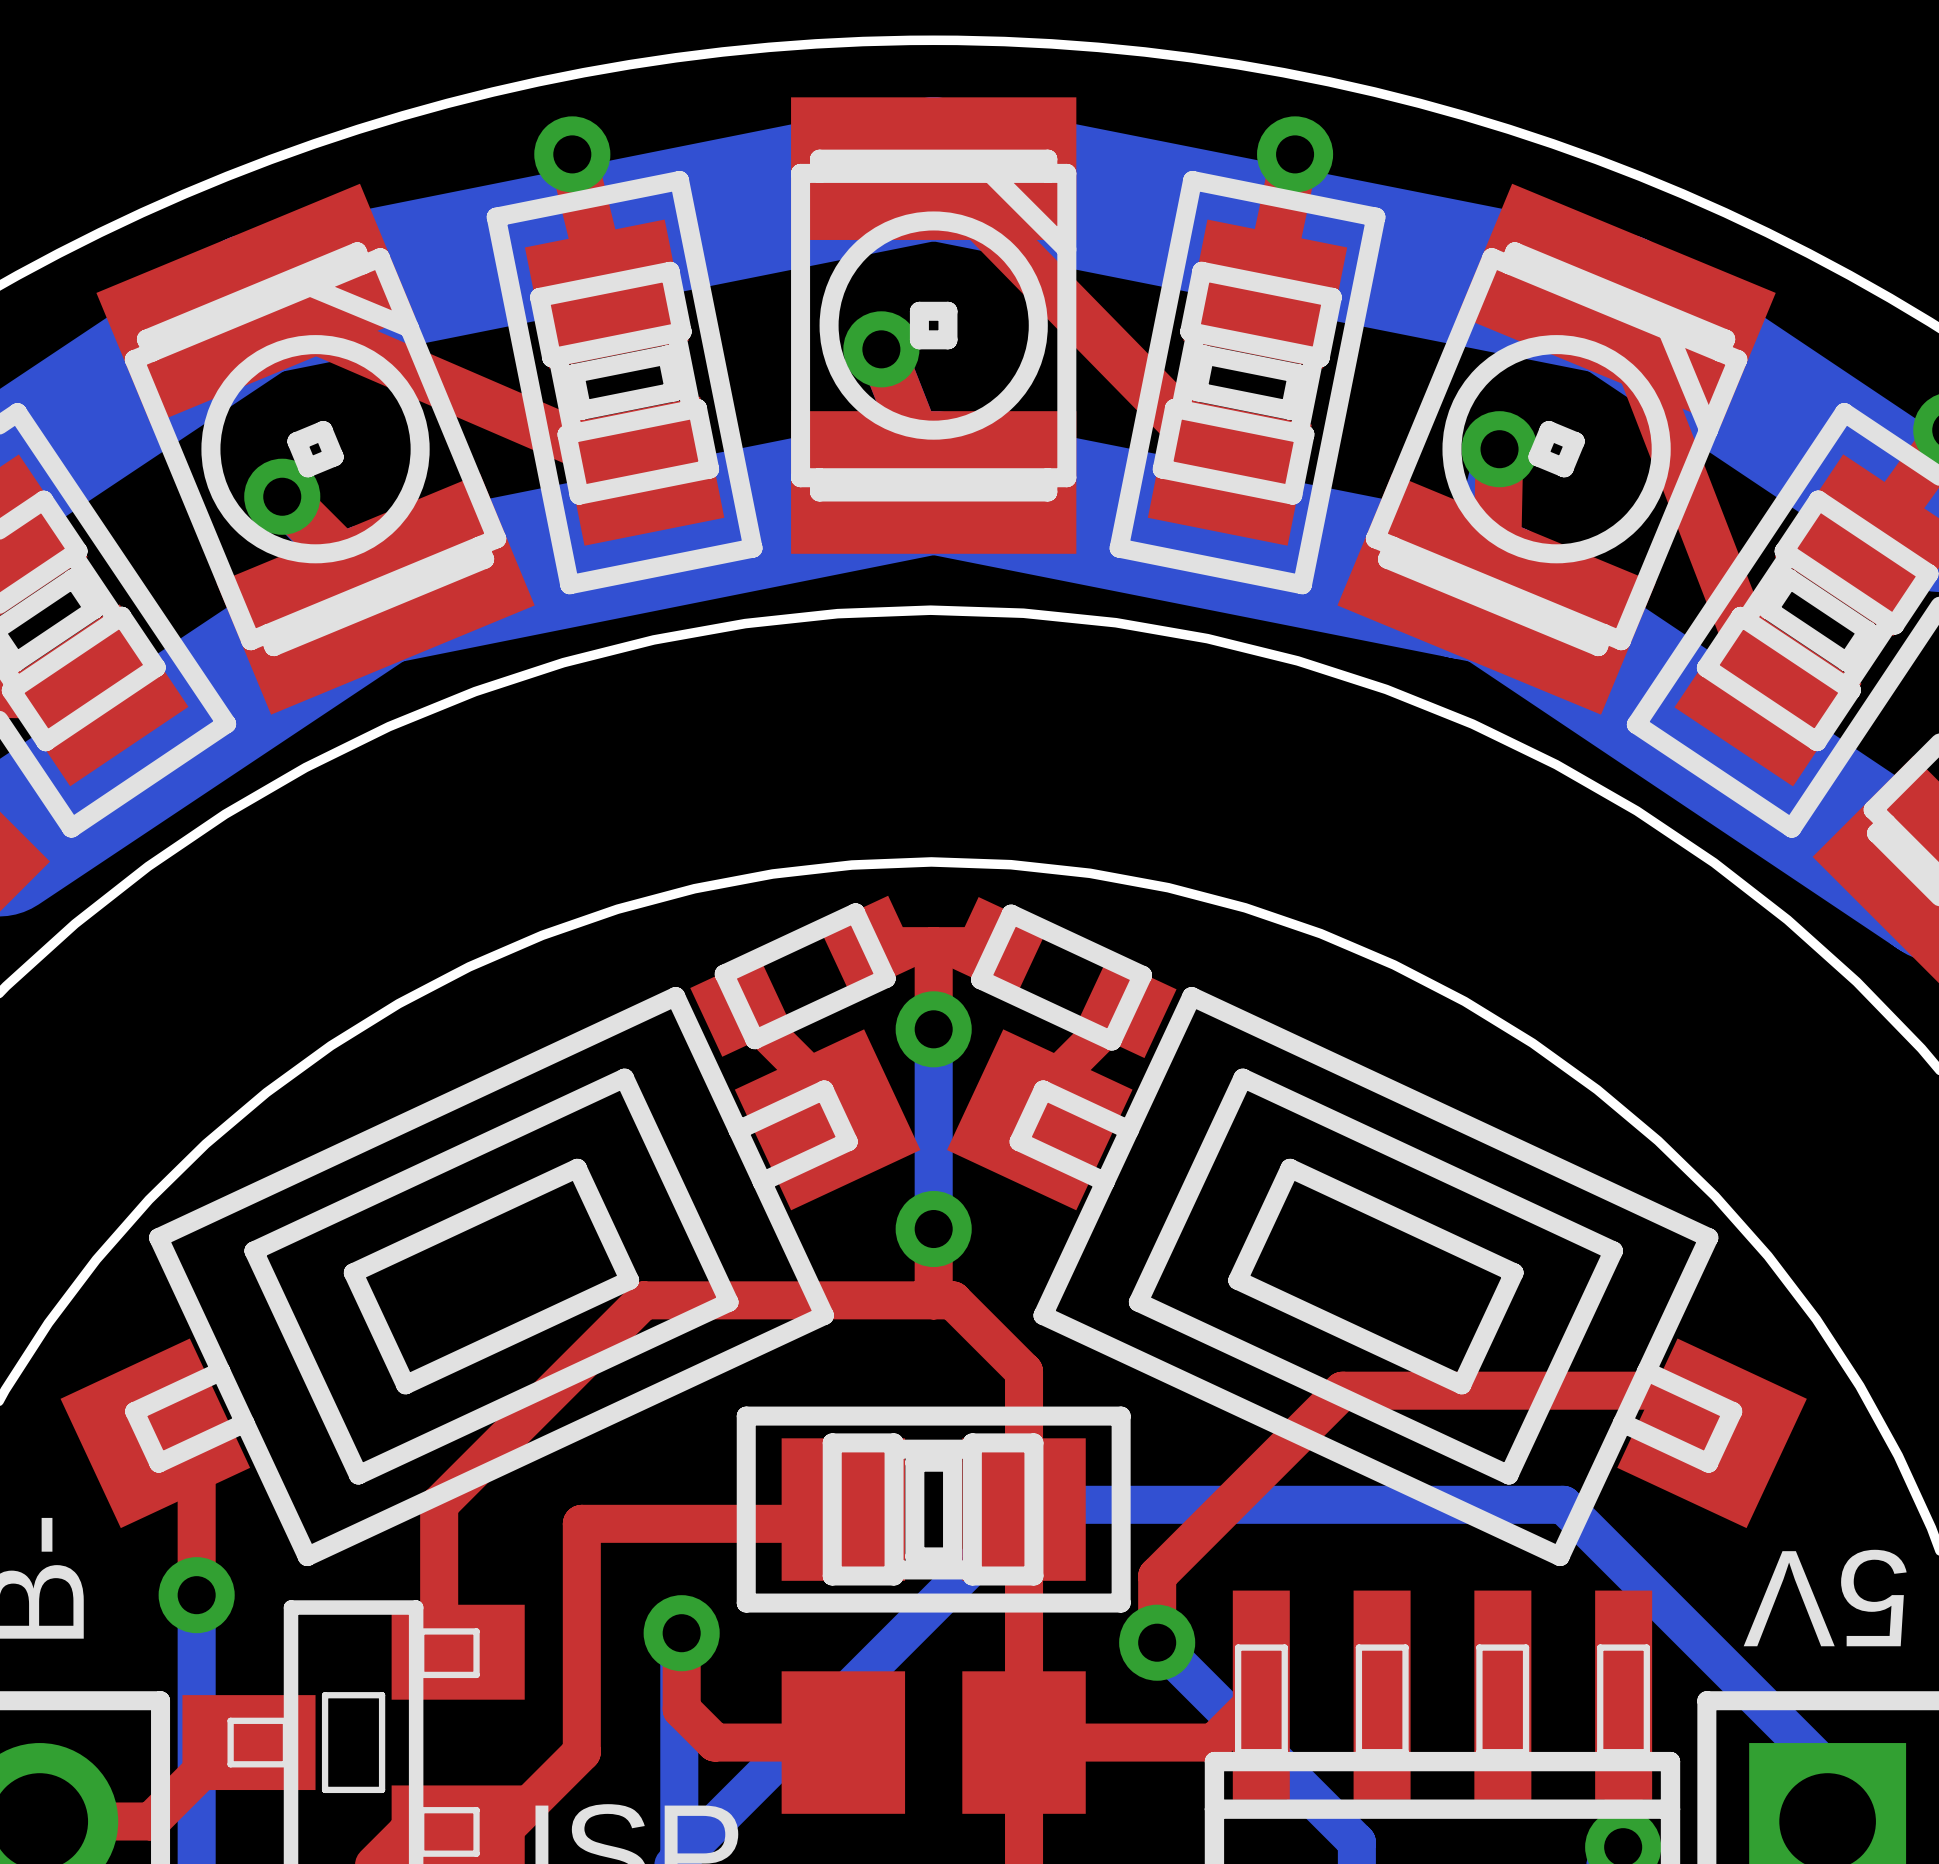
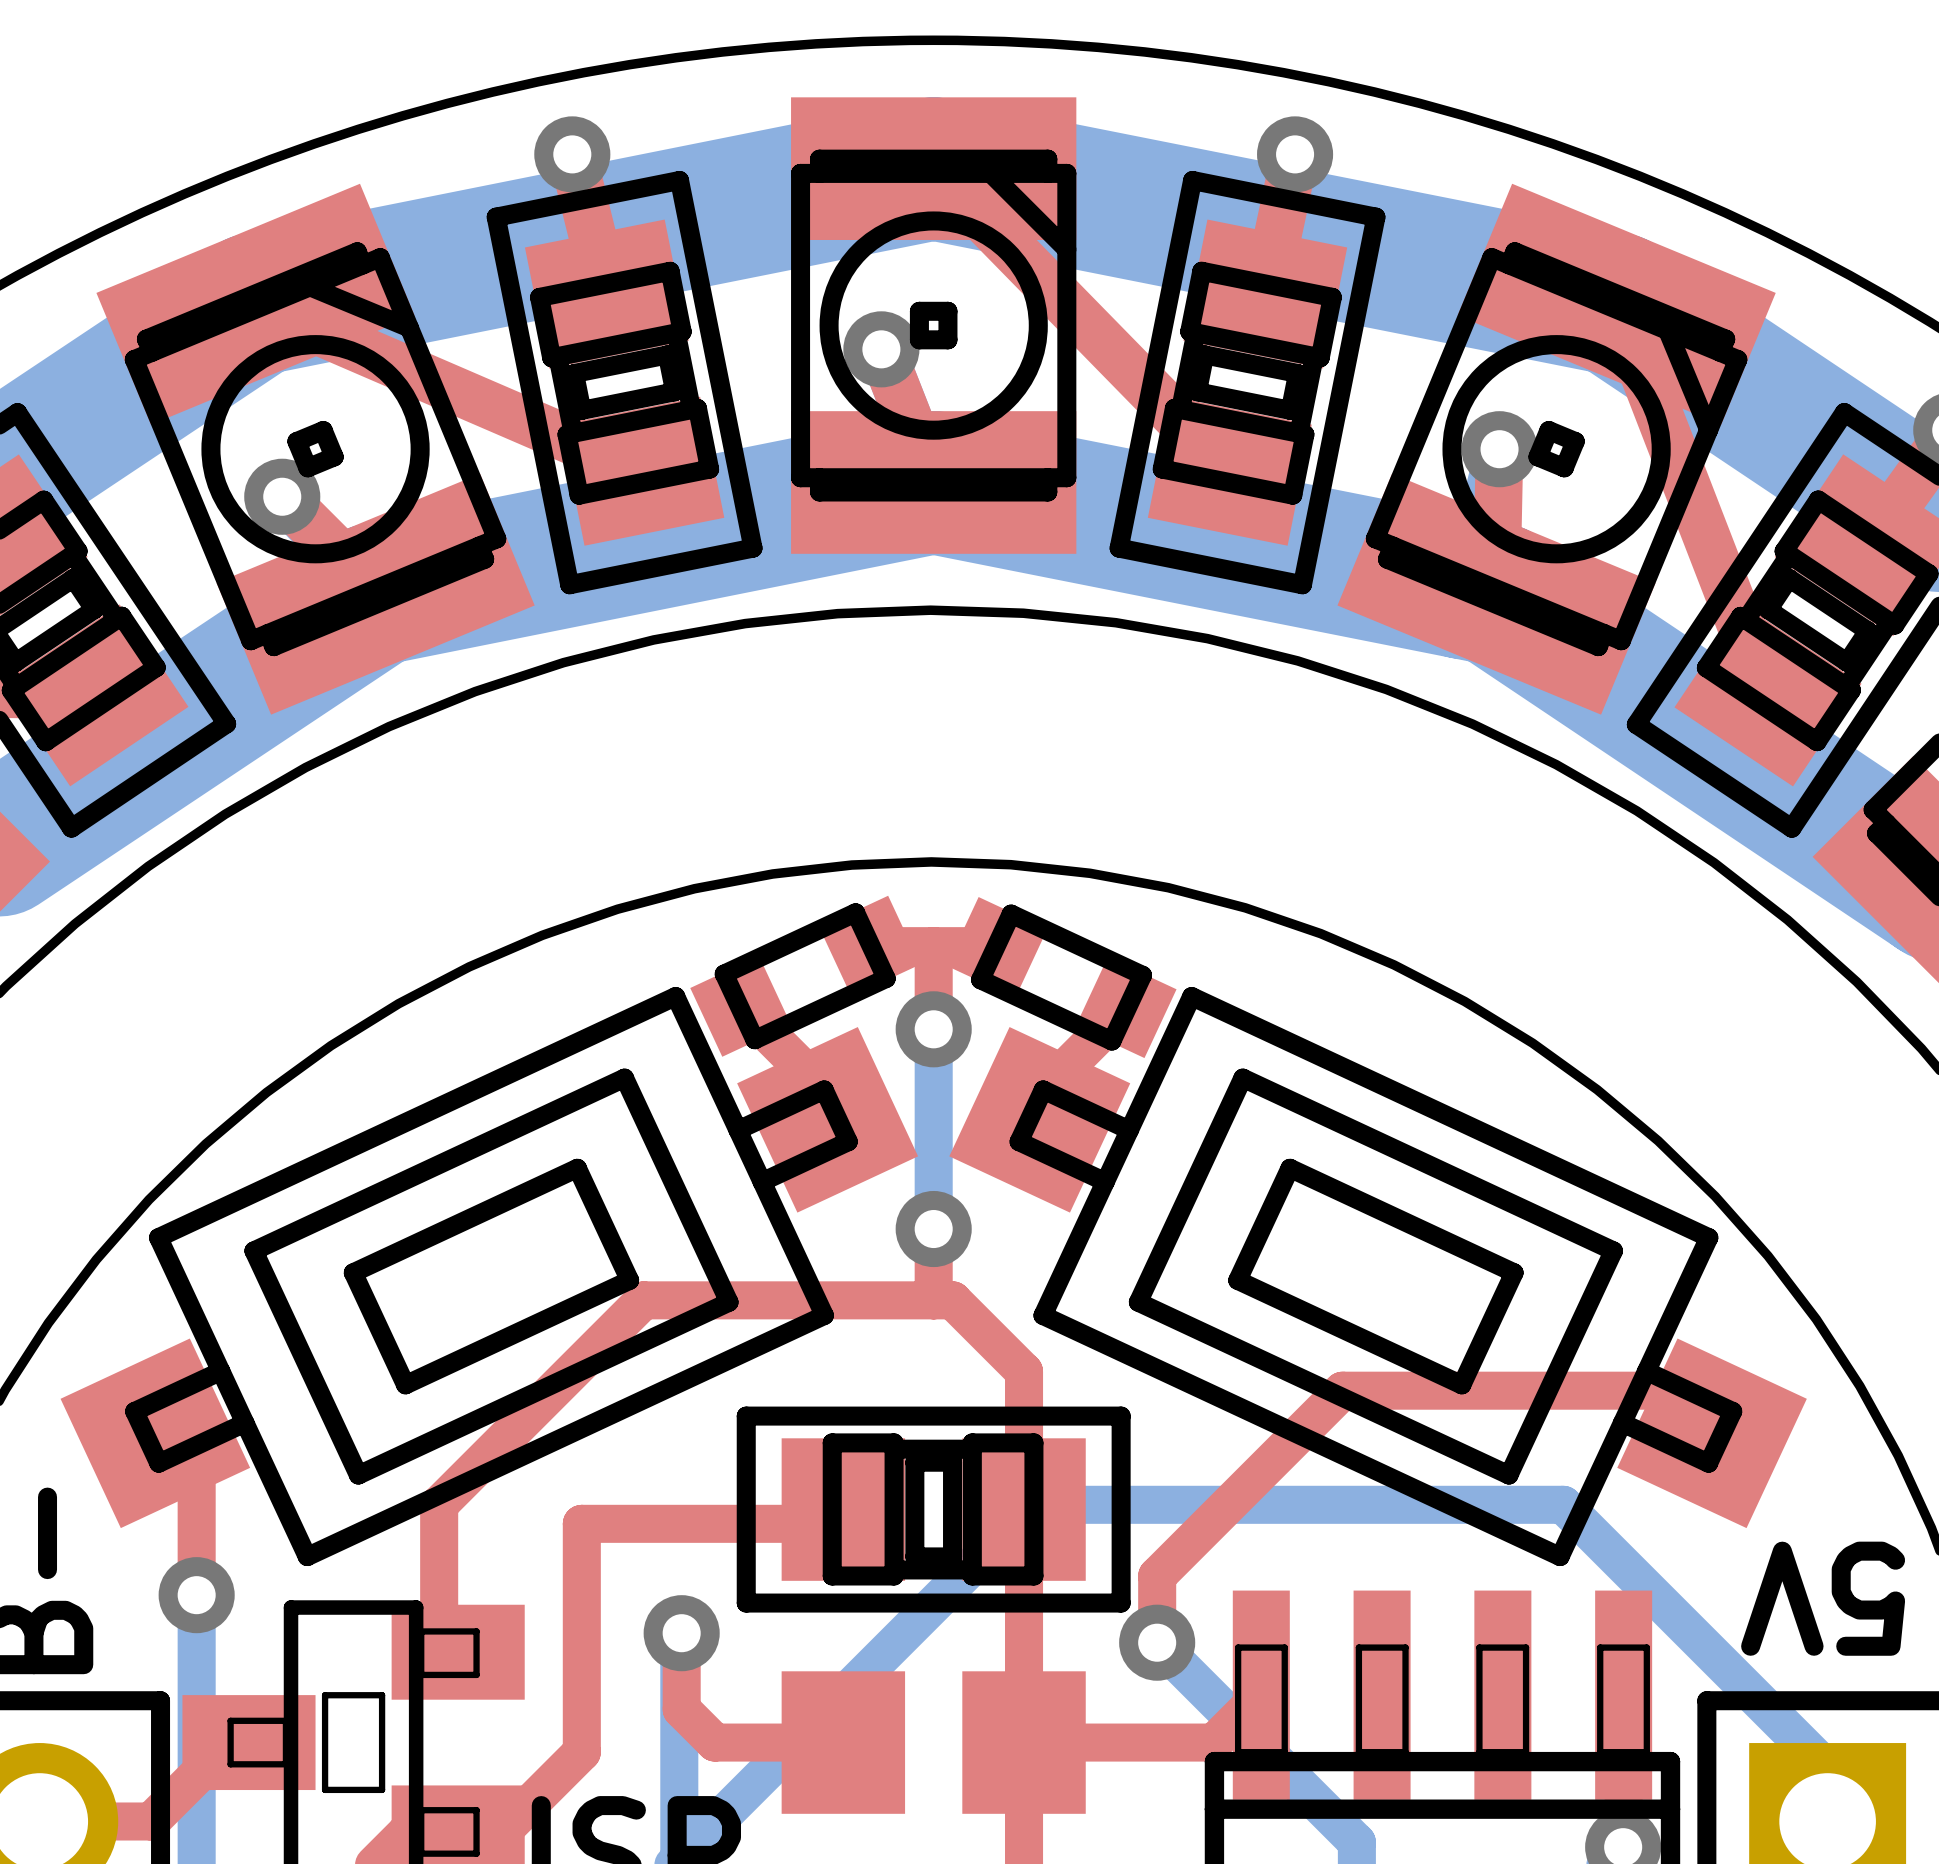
part footprint: [60, 987, 921, 1567] -> [60, 987, 919, 1567]
part footprint: [946, 987, 1807, 1567] -> [949, 987, 1807, 1567]

